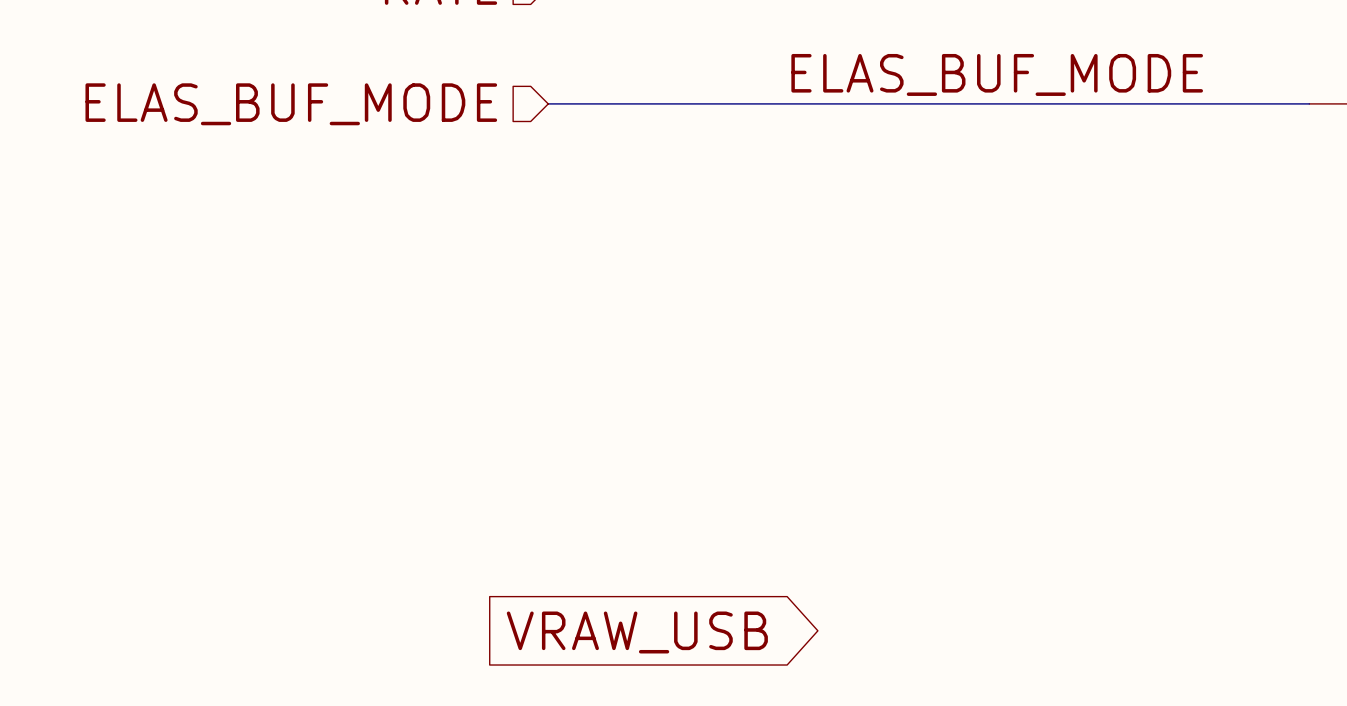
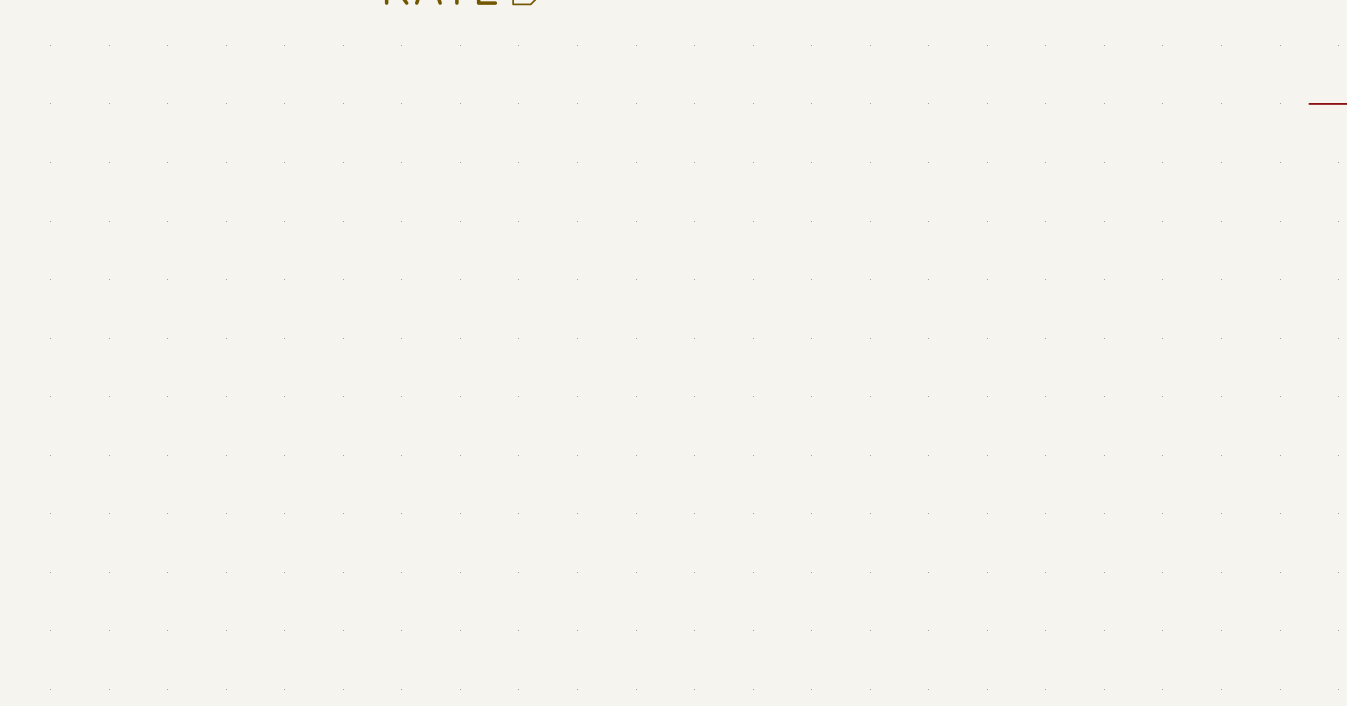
label: ELAS_BUF_MODE (997, 74) -> none
wire: (548, 103) (1309, 103) -> none
hierarchical label: ELAS_BUF_MODE (291, 104) -> none
global label: VRAW_USB (637, 632) -> none

